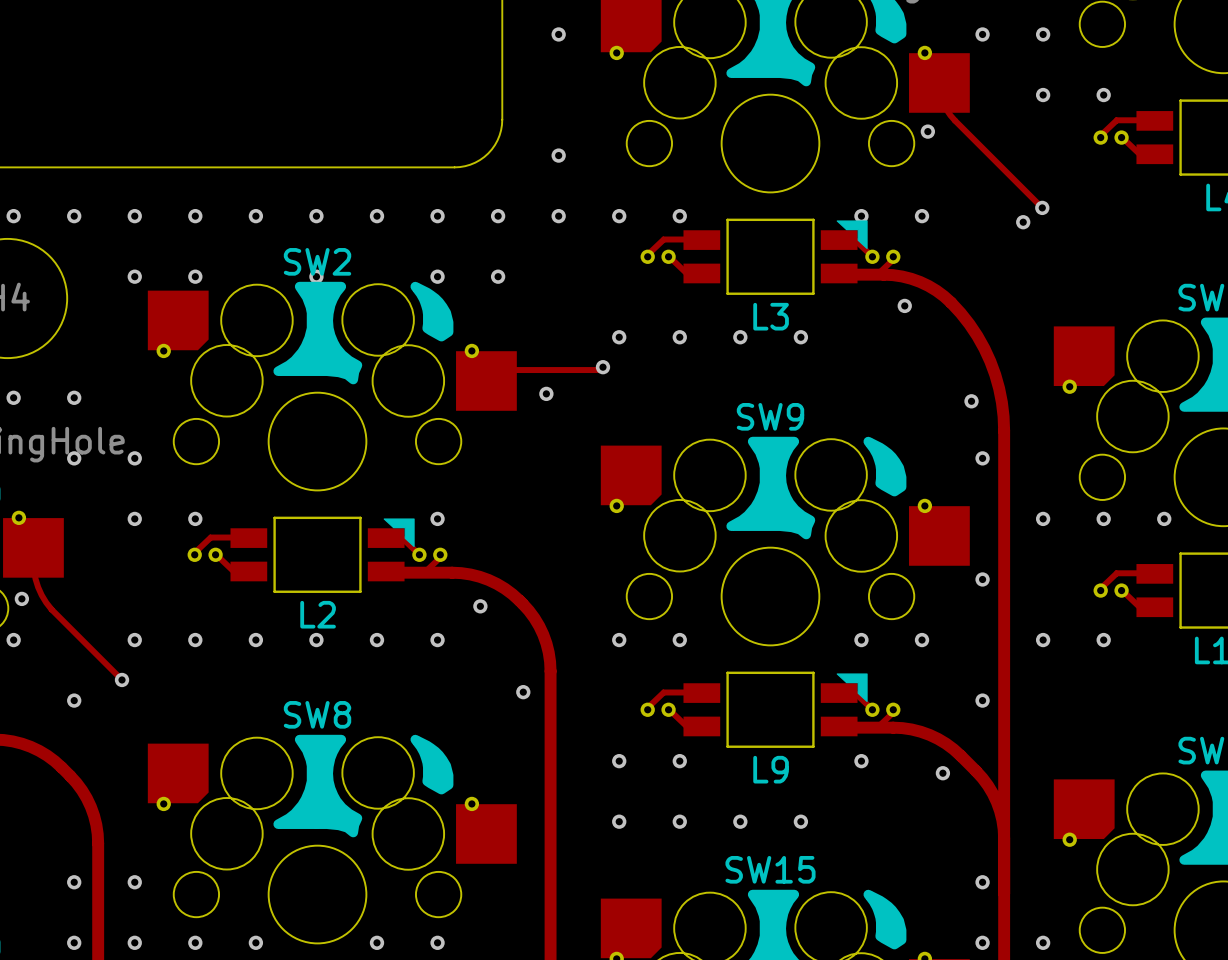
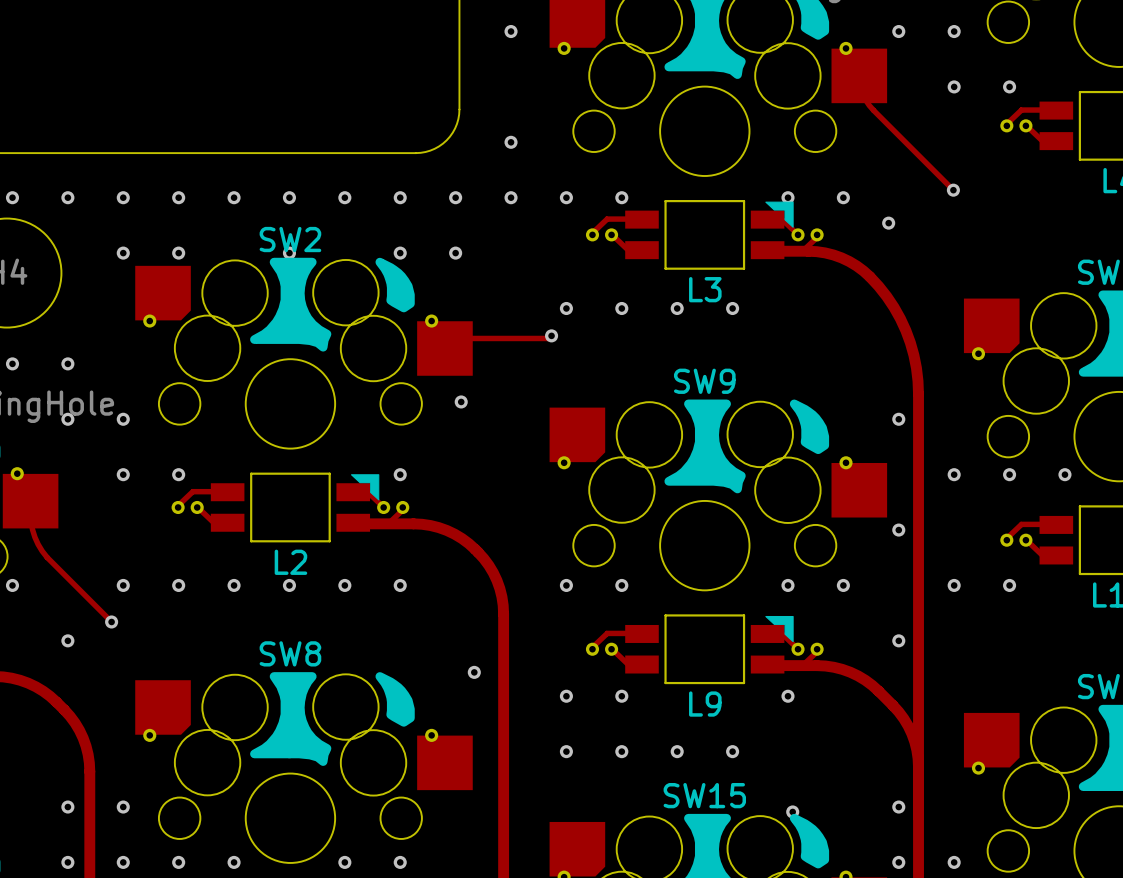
via: (927, 131) -> none
via: (1023, 222) -> none
via: none -> (888, 223)
via: (904, 305) -> none
via position: (546, 393) -> (461, 401)
via: (971, 401) -> none
via: (21, 598) -> none
via: (480, 606) -> none
via position: (523, 692) -> (474, 672)
via position: (942, 773) -> (792, 811)

